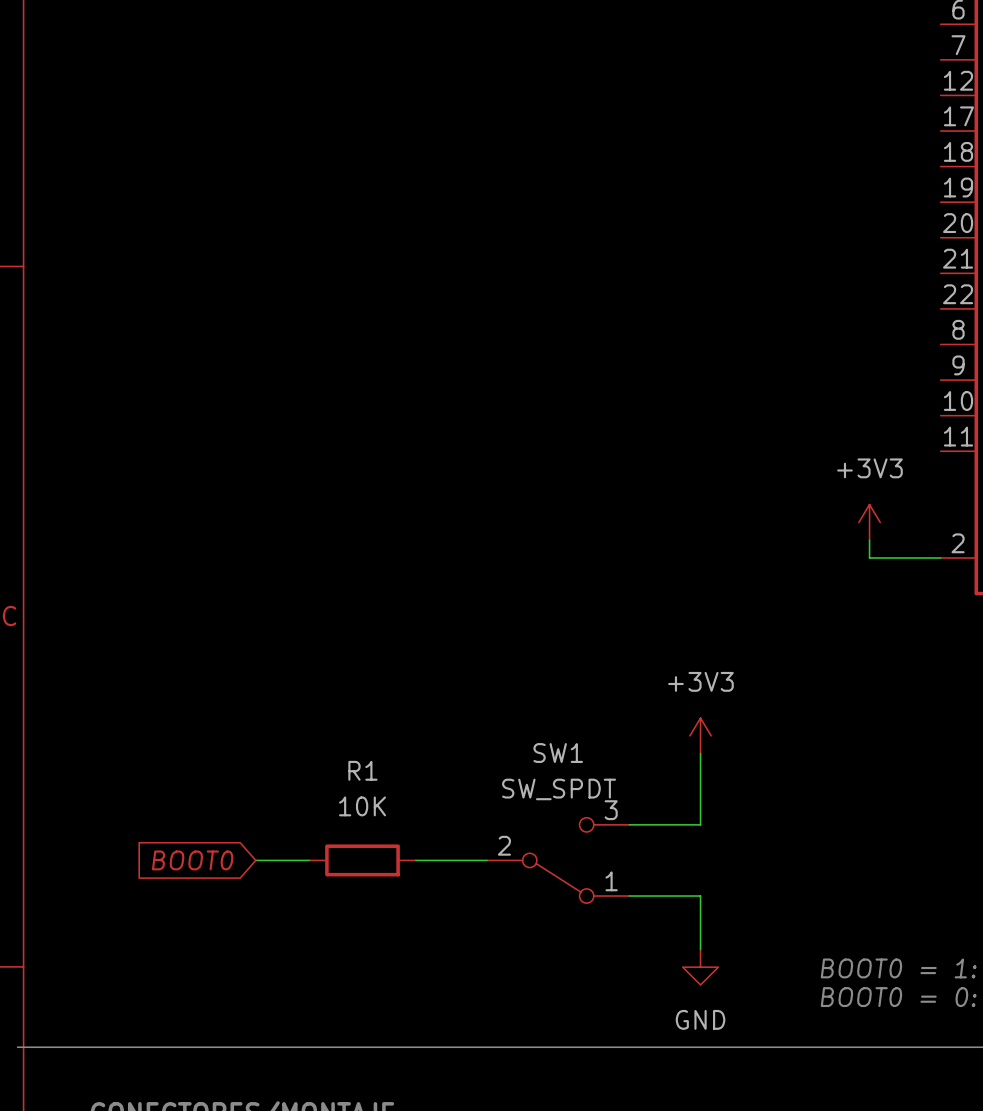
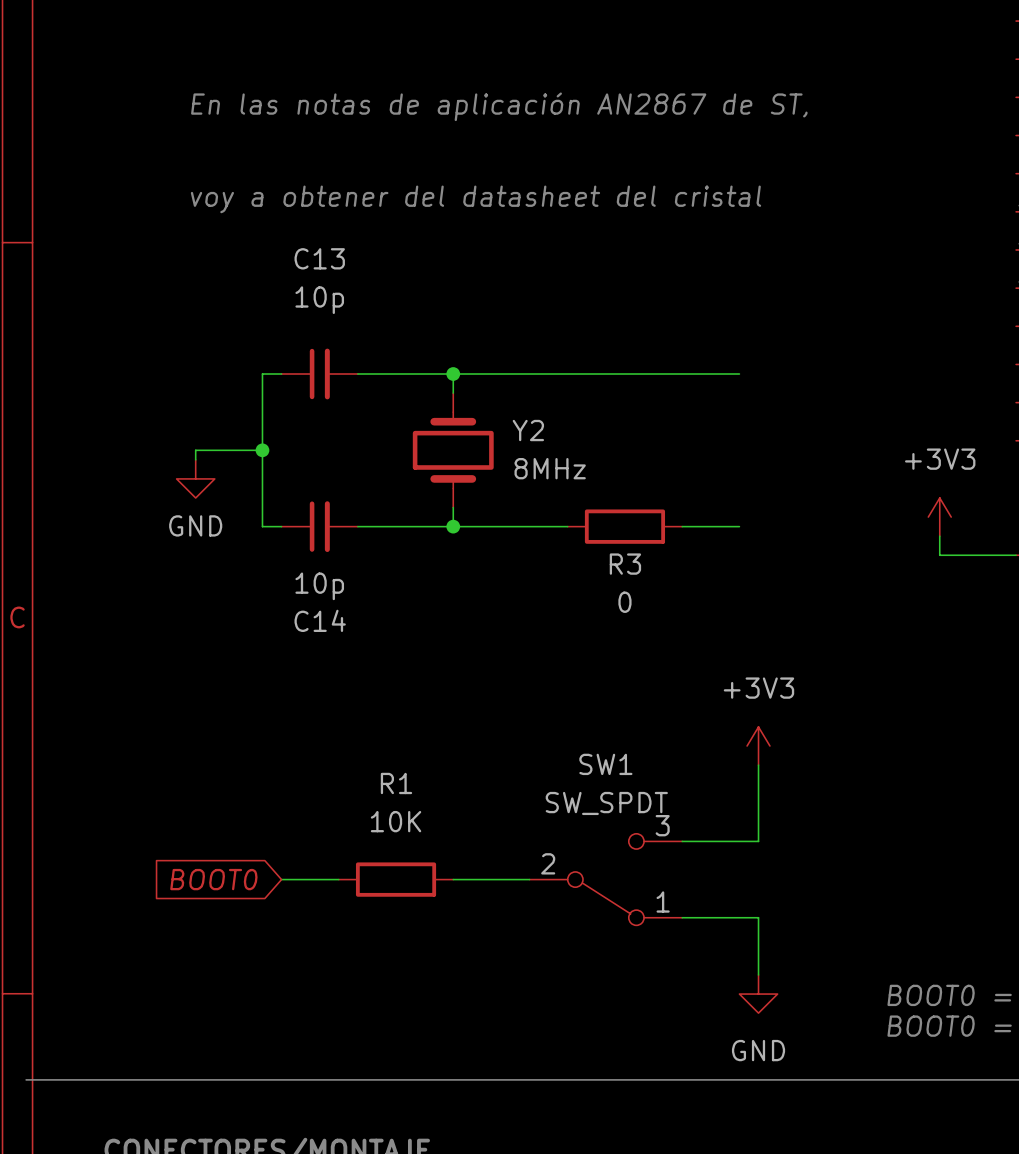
text: none -> En las notas de aplicación AN2867 de ST, (499, 106)
text: none -> voy a obtener del datasheet del cristal (476, 199)
wire: none -> (281, 374) (262, 374) (262, 526) (281, 526)
C13: none -> 10p (319, 374)
wire: none -> (357, 374) (739, 374)
wire: none -> (453, 374) (453, 393)
junction: none -> (453, 374)
wire: none -> (262, 450) (195, 450) (195, 459)
junction: none -> (262, 450)
Y2: none -> 8MHz (453, 450)
power symbol: none -> GND (195, 478)
wire: none -> (453, 507) (453, 526)
C14: none -> 10p (319, 526)
wire: none -> (357, 526) (567, 526)
junction: none -> (453, 526)
R3: none -> 0 (624, 526)
wire: none -> (682, 526) (739, 526)

